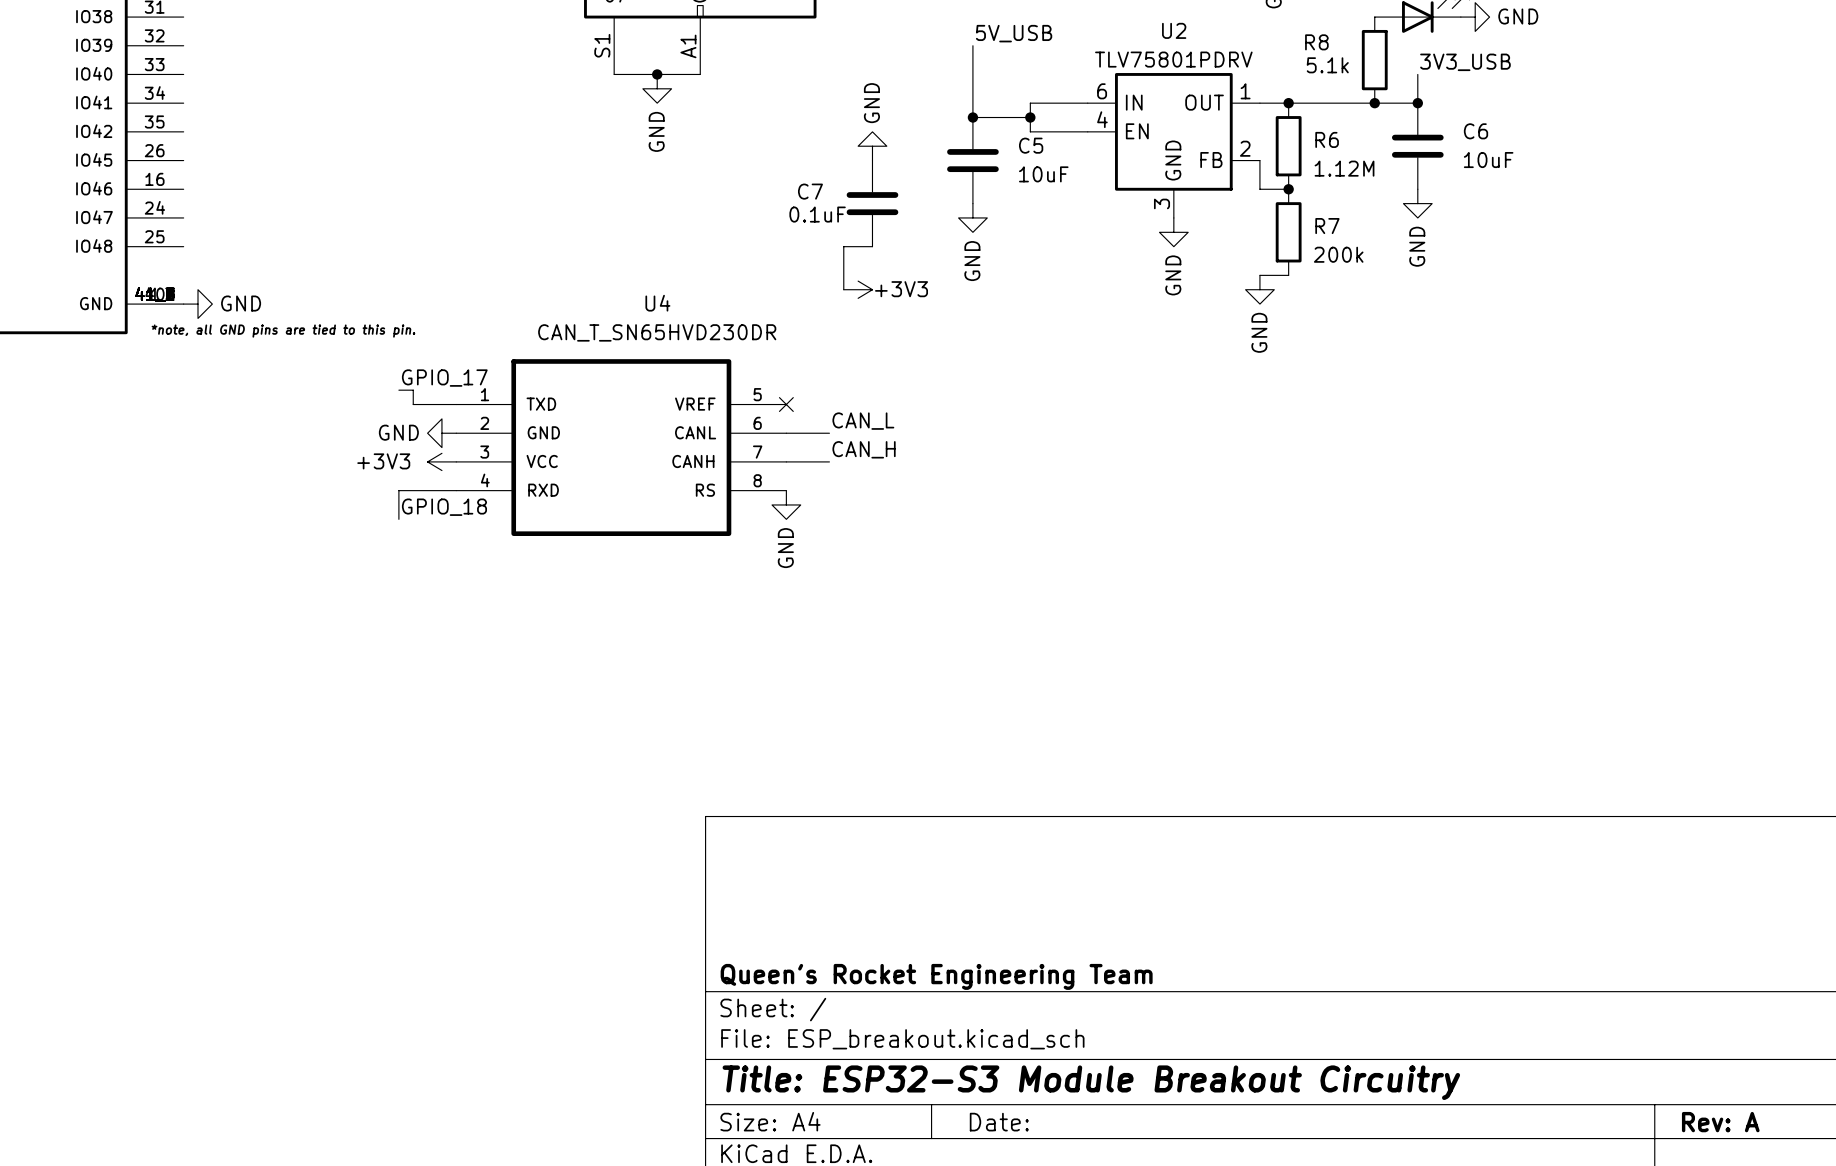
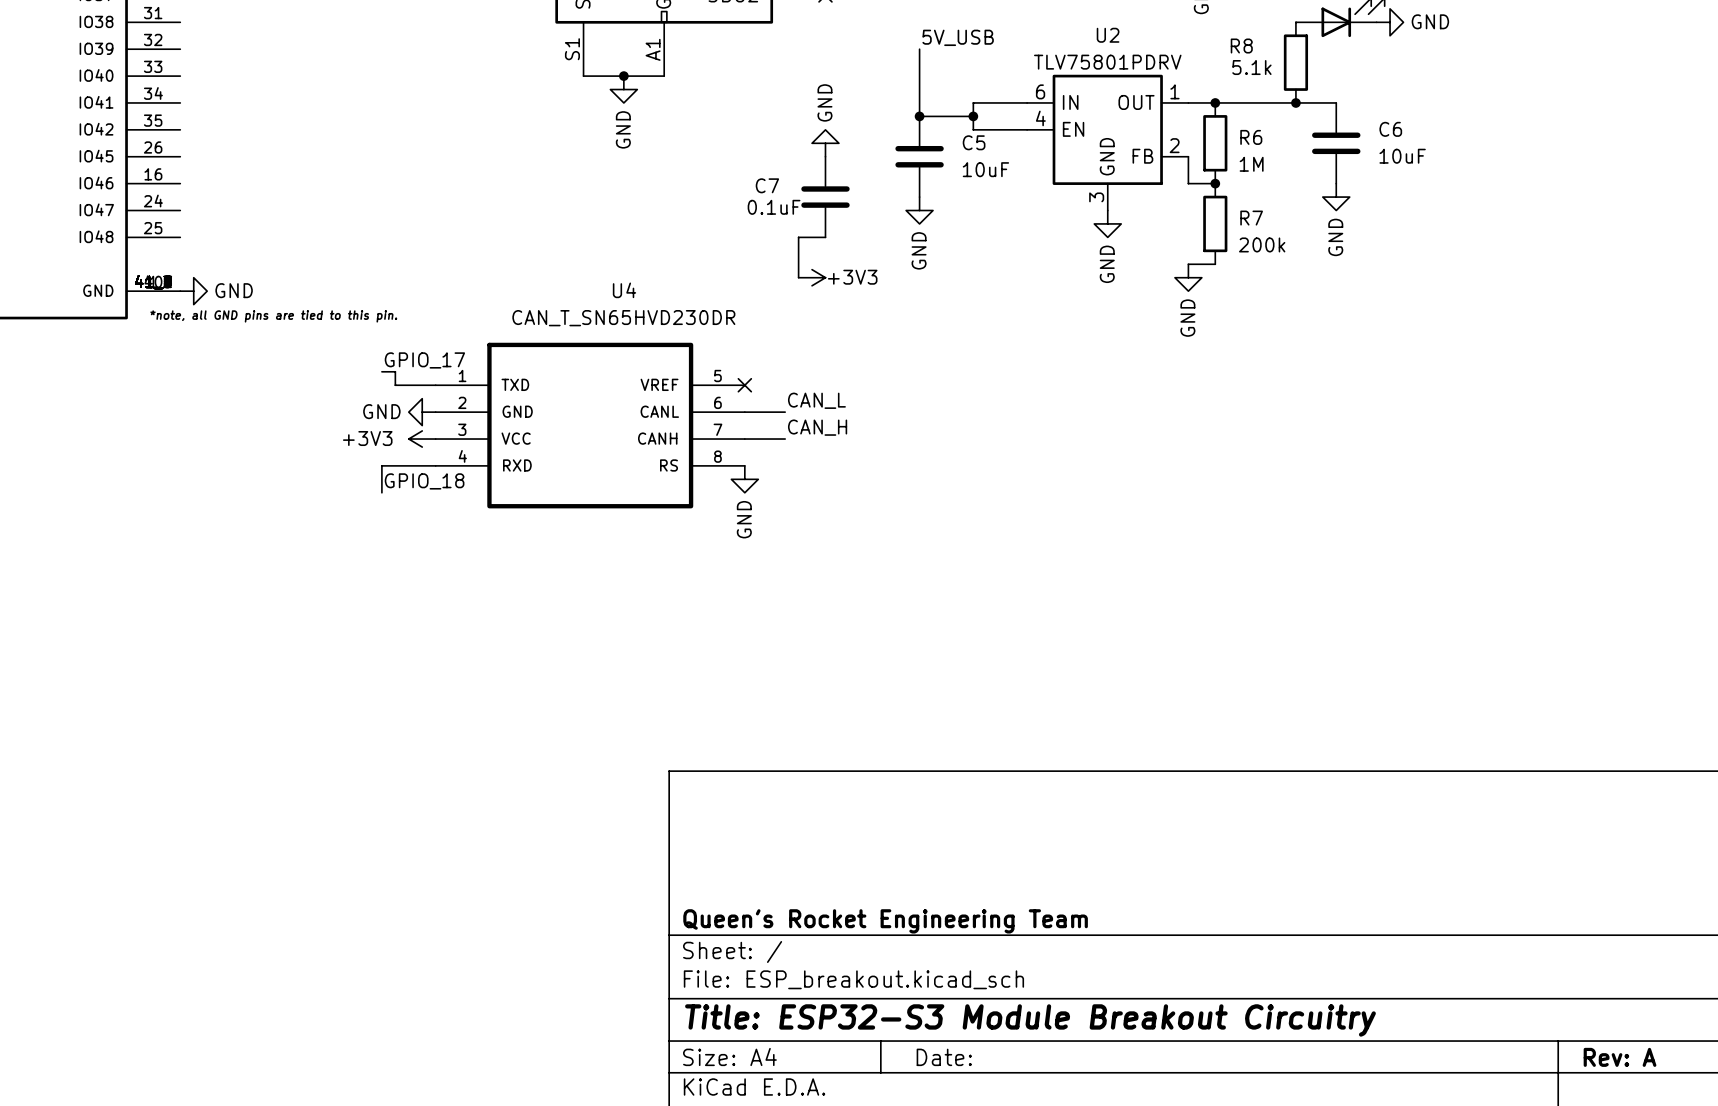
label: 3V3_USB (1465, 62) -> none
wire: (1417, 74) (1417, 103) -> none
junction: (1417, 103) -> none
R6 value: 1.12M (1344, 168) -> 1M (1251, 164)

